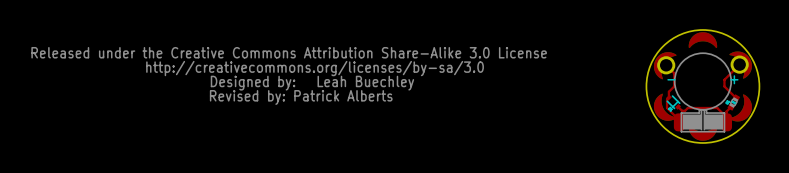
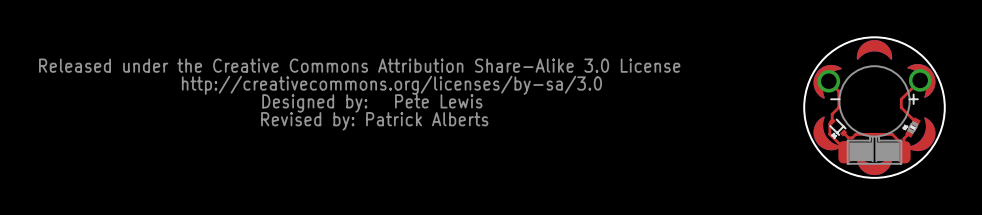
text: Leah Buechley (365, 83) -> Pete Lewis (438, 101)

